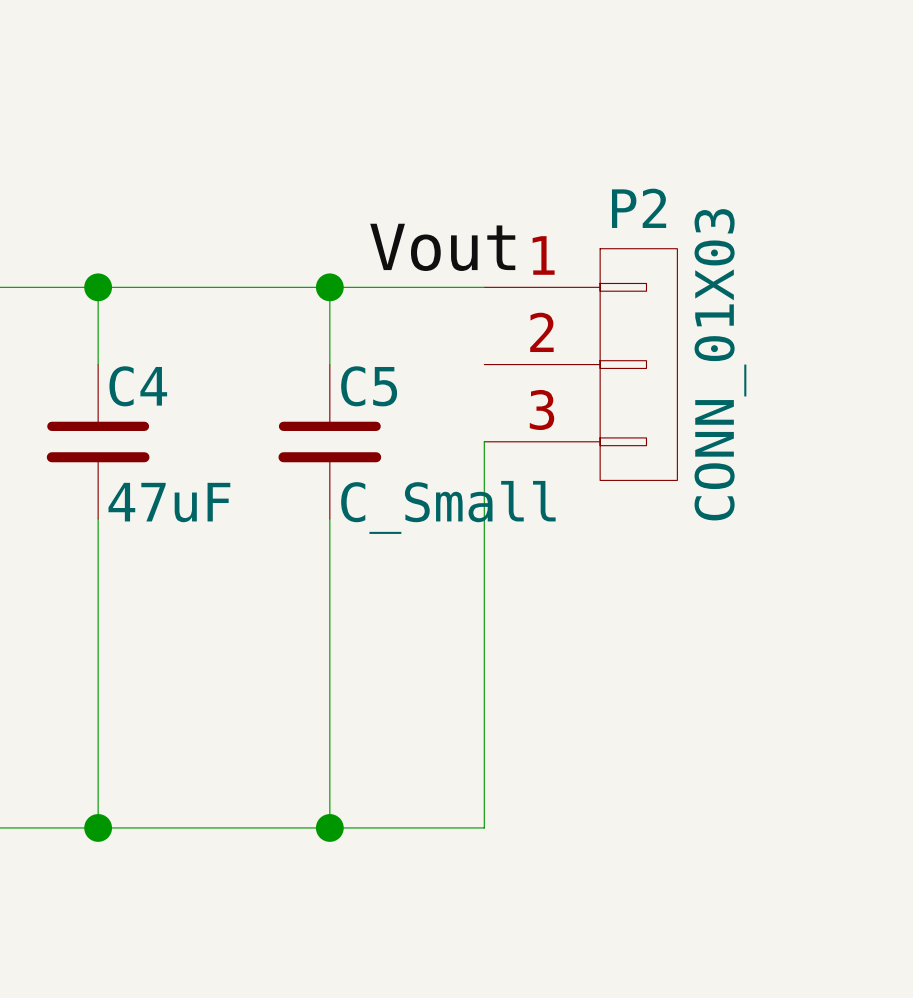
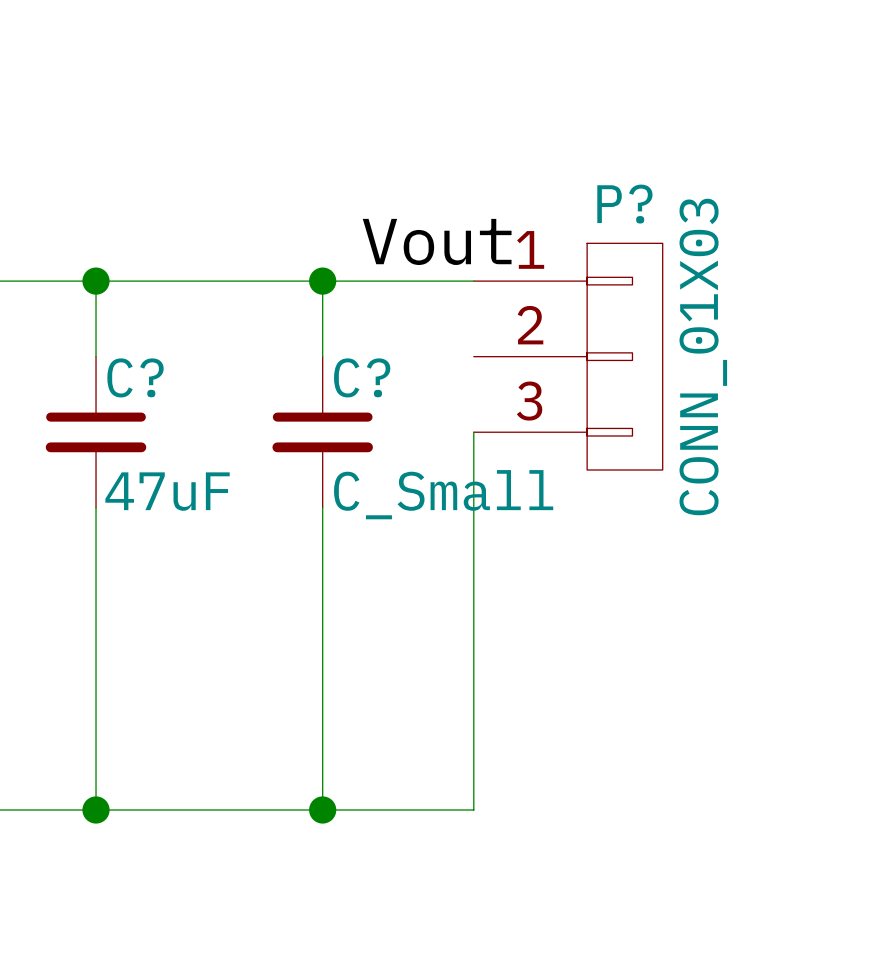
P2 name: P2 (639, 208) -> P? (624, 204)
C4 name: C4 (138, 386) -> C? (135, 377)
C5 name: C5 (369, 386) -> C? (362, 377)

